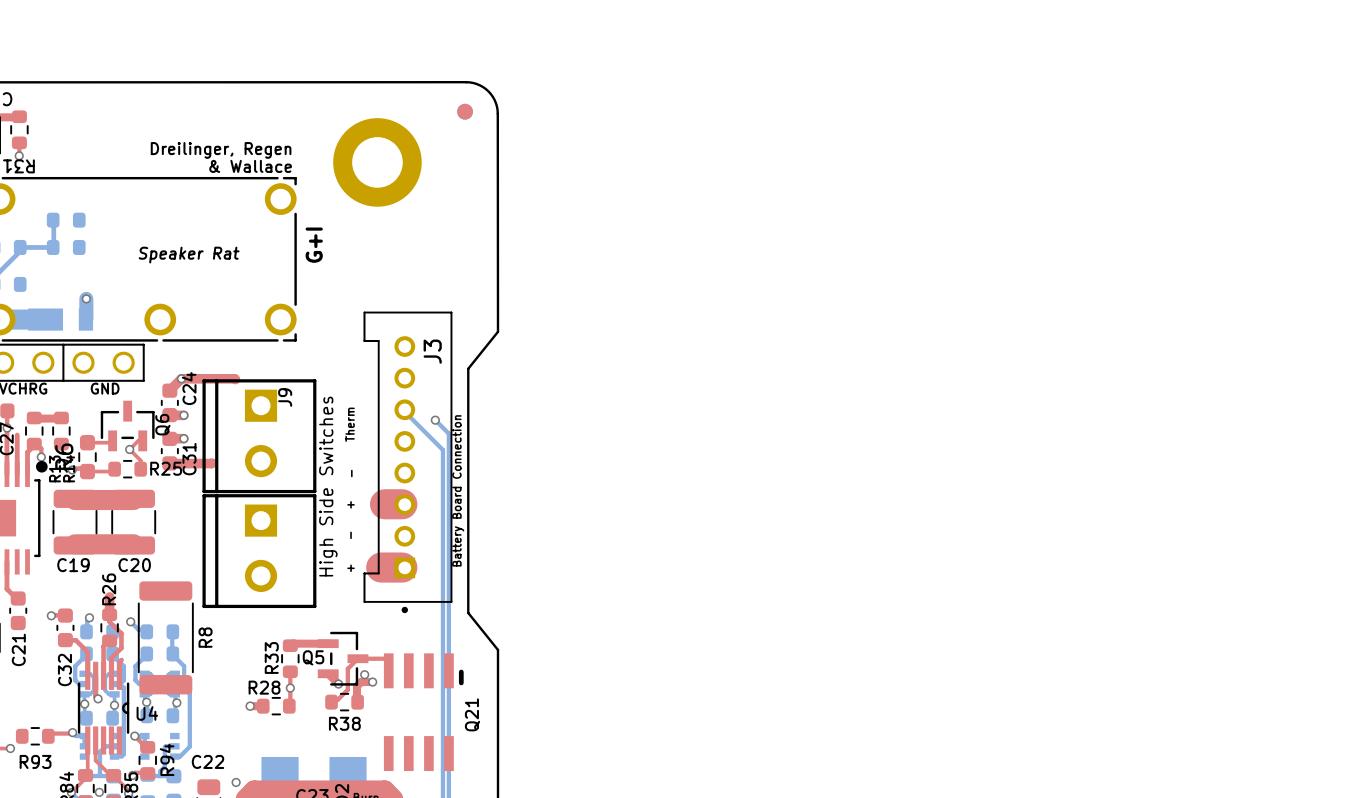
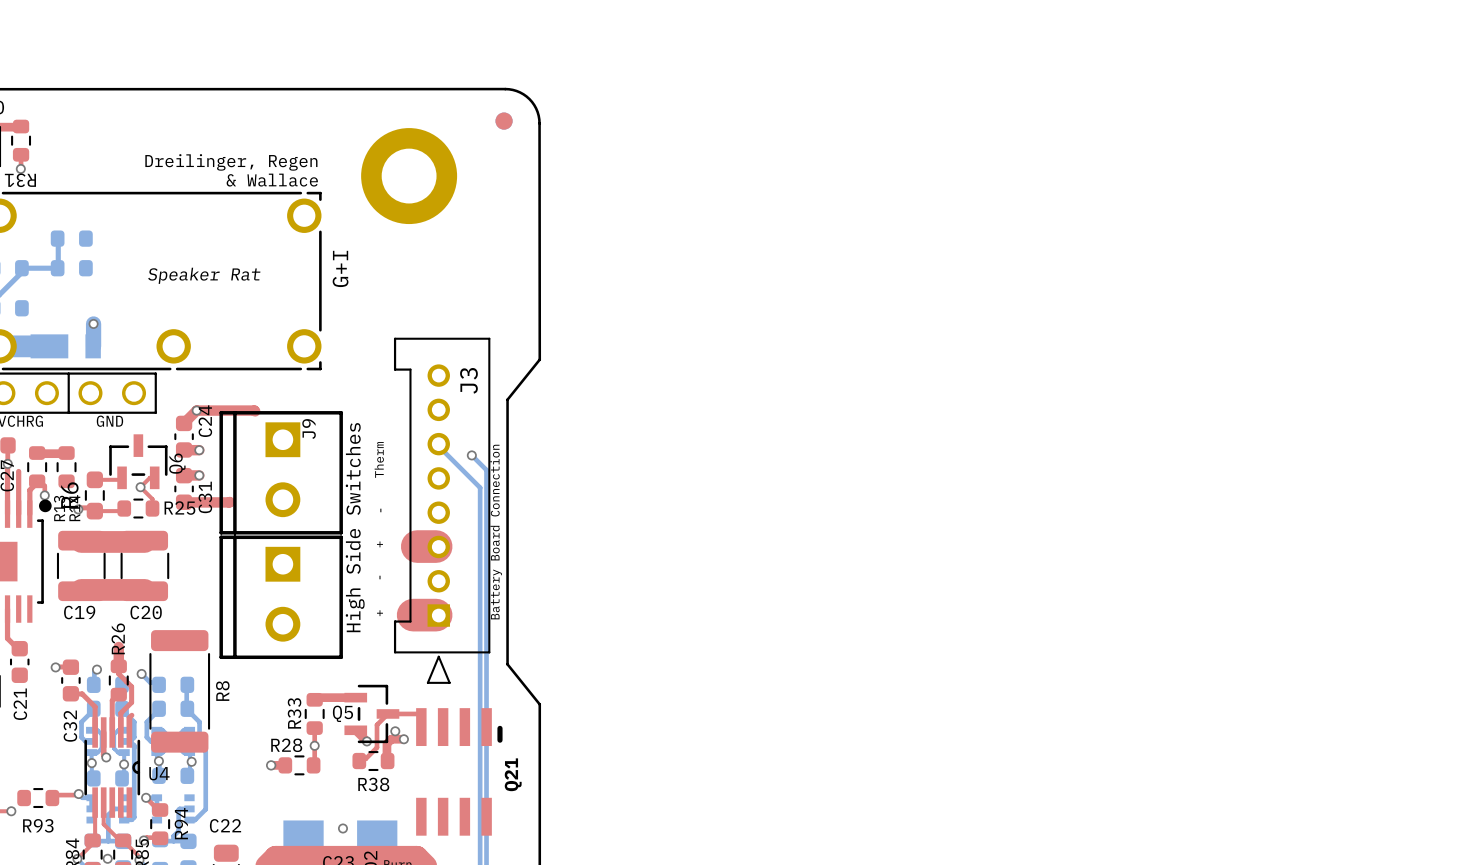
J3 footprint: [363, 311, 453, 614] -> [393, 337, 491, 684]
via position: (236, 782) -> (342, 828)

